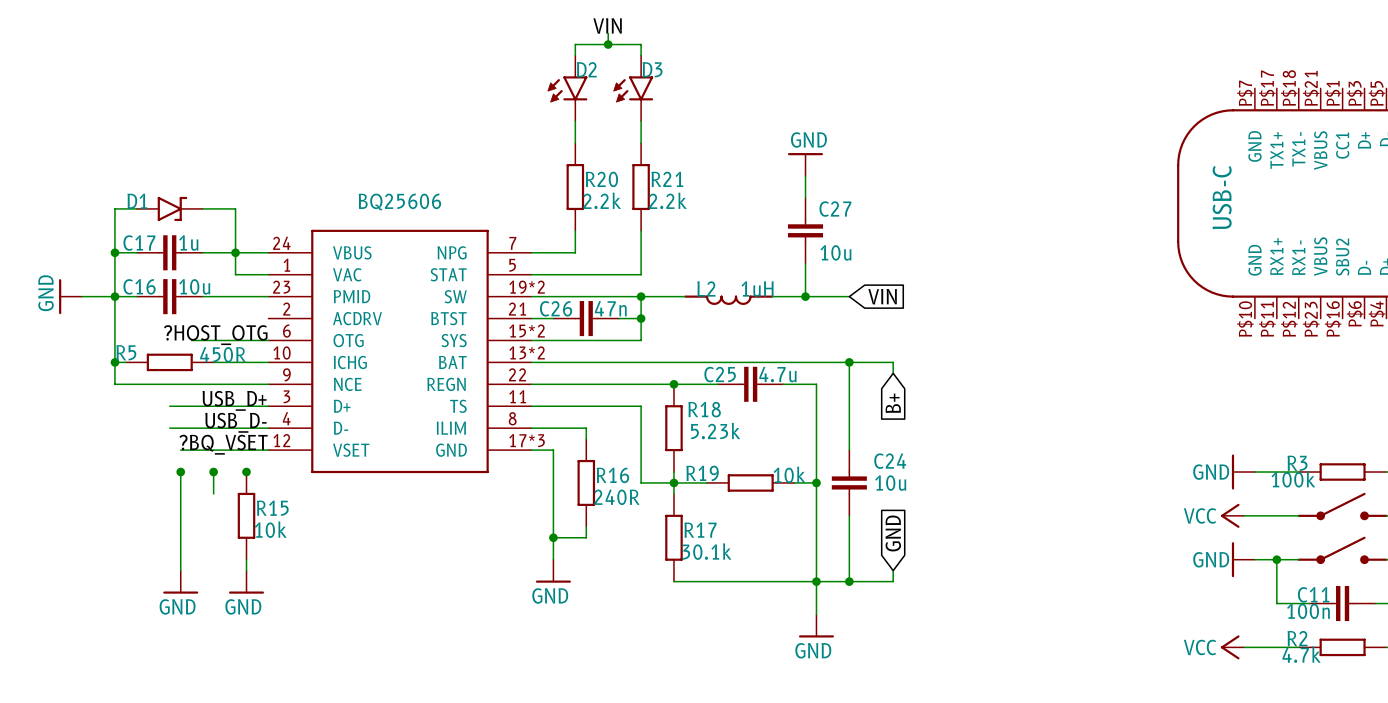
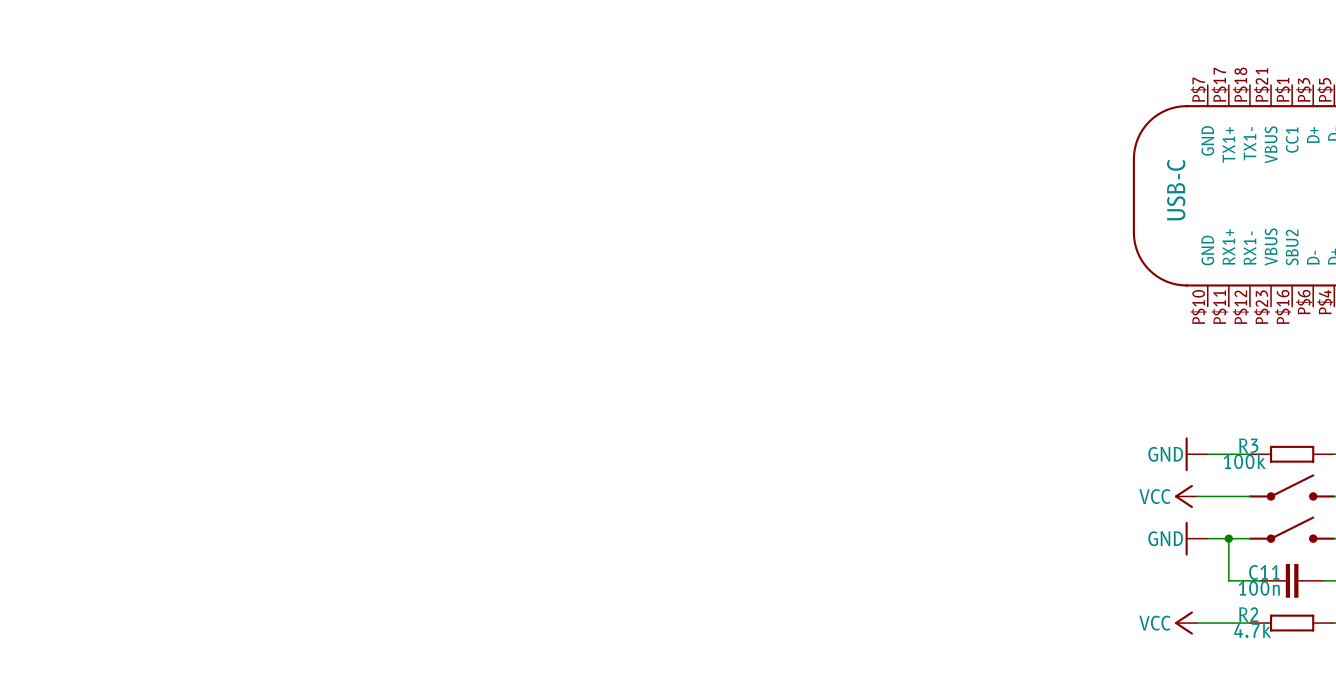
label: VIN (607, 26) -> none
wire: (608, 33) (608, 44) -> none
junction: (608, 44) -> none
wire: (575, 55) (575, 44) (641, 44) (641, 55) -> none
D2: (567, 88) -> none
D3: (633, 88) -> none
wire: (575, 121) (575, 143) -> none
wire: (641, 121) (641, 143) -> none
power symbol: GND (805, 164) -> none
wire: (805, 176) (805, 197) -> none
R20: 2.2k (575, 187) -> none
R21: 2.2k (641, 187) -> none
wire: (136, 208) (114, 208) (114, 384) (268, 384) -> none
D1: (169, 208) -> none
wire: (202, 208) (235, 208) (235, 274) (268, 274) -> none
wire: (575, 230) (575, 252) (531, 252) -> none
wire: (641, 230) (641, 274) (531, 274) -> none
C27: 10u (805, 230) -> none
wire: (114, 252) (136, 252) -> none
junction: (114, 252) -> none
C17: 1u (169, 252) -> none
wire: (202, 252) (268, 252) -> none
junction: (235, 252) -> none
wire: (805, 263) (805, 296) -> none
power symbol: GND (70, 296) -> none
wire: (82, 296) (136, 296) -> none
junction: (114, 296) -> none
C16: 10u (169, 296) -> none
wire: (202, 296) (268, 296) -> none
wire: (531, 296) (684, 296) -> none
wire: (641, 296) (641, 340) (531, 340) -> none
junction: (641, 296) -> none
wire: (772, 296) (849, 296) -> none
junction: (805, 296) -> none
global label: VIN (882, 296) -> none
L2: 1uH (728, 300) -> none
wire: (531, 318) (553, 318) -> none
C26: 47n (586, 318) -> none
wire: (619, 318) (641, 318) -> none
junction: (641, 318) -> none
label: ?HOST_OTG (215, 335) -> none
wire: (191, 340) (268, 340) -> none
part: (399, 351) -> none
wire: (114, 362) (125, 362) -> none
junction: (114, 362) -> none
R5: 450R (169, 362) -> none
wire: (213, 362) (268, 362) -> none
wire: (531, 362) (893, 362) (893, 373) -> none
wire: (849, 362) (849, 450) -> none
junction: (849, 362) -> none
wire: (531, 384) (717, 384) -> none
junction: (673, 384) -> none
C25: 4.7u (750, 384) -> none
wire: (783, 384) (816, 384) (816, 614) -> none
label: USB_D+ (234, 400) -> none
global label: B+ (893, 403) -> none
wire: (169, 406) (268, 406) -> none
wire: (531, 406) (641, 406) (641, 482) (706, 482) -> none
label: USB_D- (235, 422) -> none
wire: (169, 428) (268, 428) -> none
wire: (531, 428) (586, 428) (586, 439) -> none
R18: 5.23k (673, 428) -> none
label: ?BQ_VSET (223, 444) -> none
wire: (180, 450) (268, 450) -> none
wire: (531, 450) (553, 450) (553, 559) -> none
wire: (180, 472) (180, 570) -> none
junction: (180, 472) -> none
wire: (213, 472) (213, 493) -> none
junction: (213, 472) -> none
junction: (246, 472) -> none
wire: (673, 472) (673, 493) -> none
R16: 240R (586, 482) -> none
junction: (673, 482) -> none
R19: 10k (750, 482) -> none
wire: (794, 482) (816, 482) -> none
junction: (816, 482) -> none
C24: 10u (849, 482) -> none
R15: 10k (246, 515) -> none
wire: (849, 515) (849, 581) -> none
wire: (586, 526) (586, 537) (553, 537) -> none
global label: GND (893, 533) -> none
junction: (553, 537) -> none
R17: 30.1k (673, 537) -> none
wire: (246, 559) (246, 570) -> none
wire: (893, 570) (893, 581) (673, 581) -> none
power symbol: GND (553, 571) -> none
junction: (816, 581) -> none
junction: (849, 581) -> none
power symbol: GND (180, 582) -> none
power symbol: GND (246, 582) -> none
power symbol: GND (816, 626) -> none

